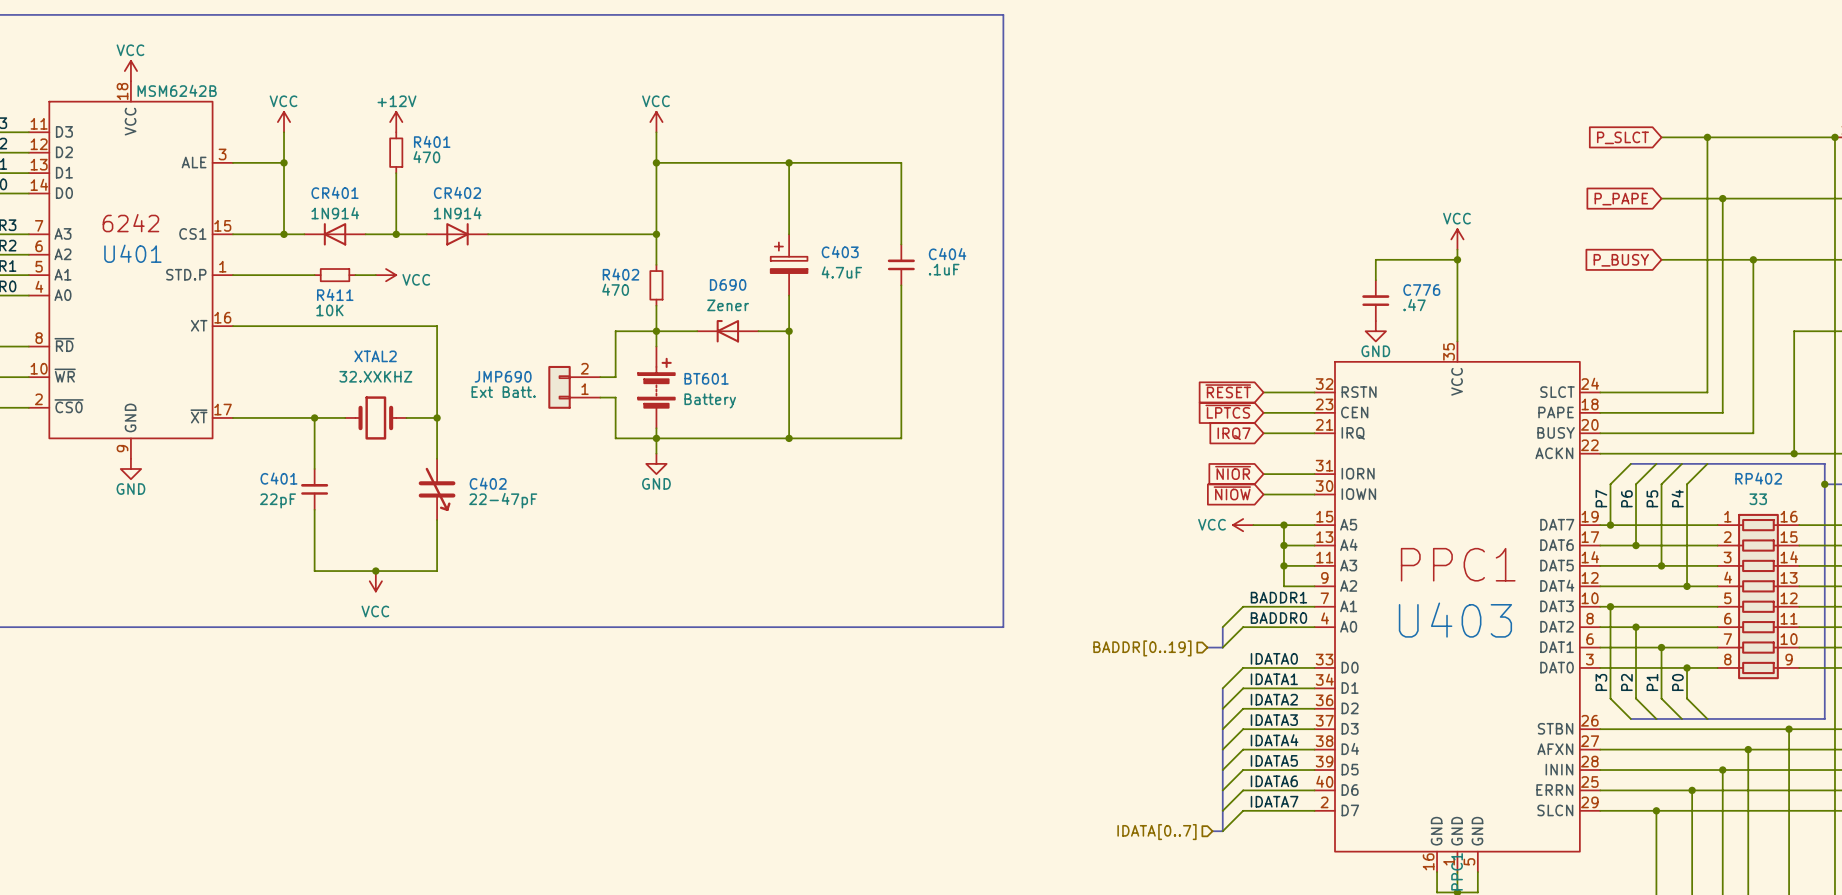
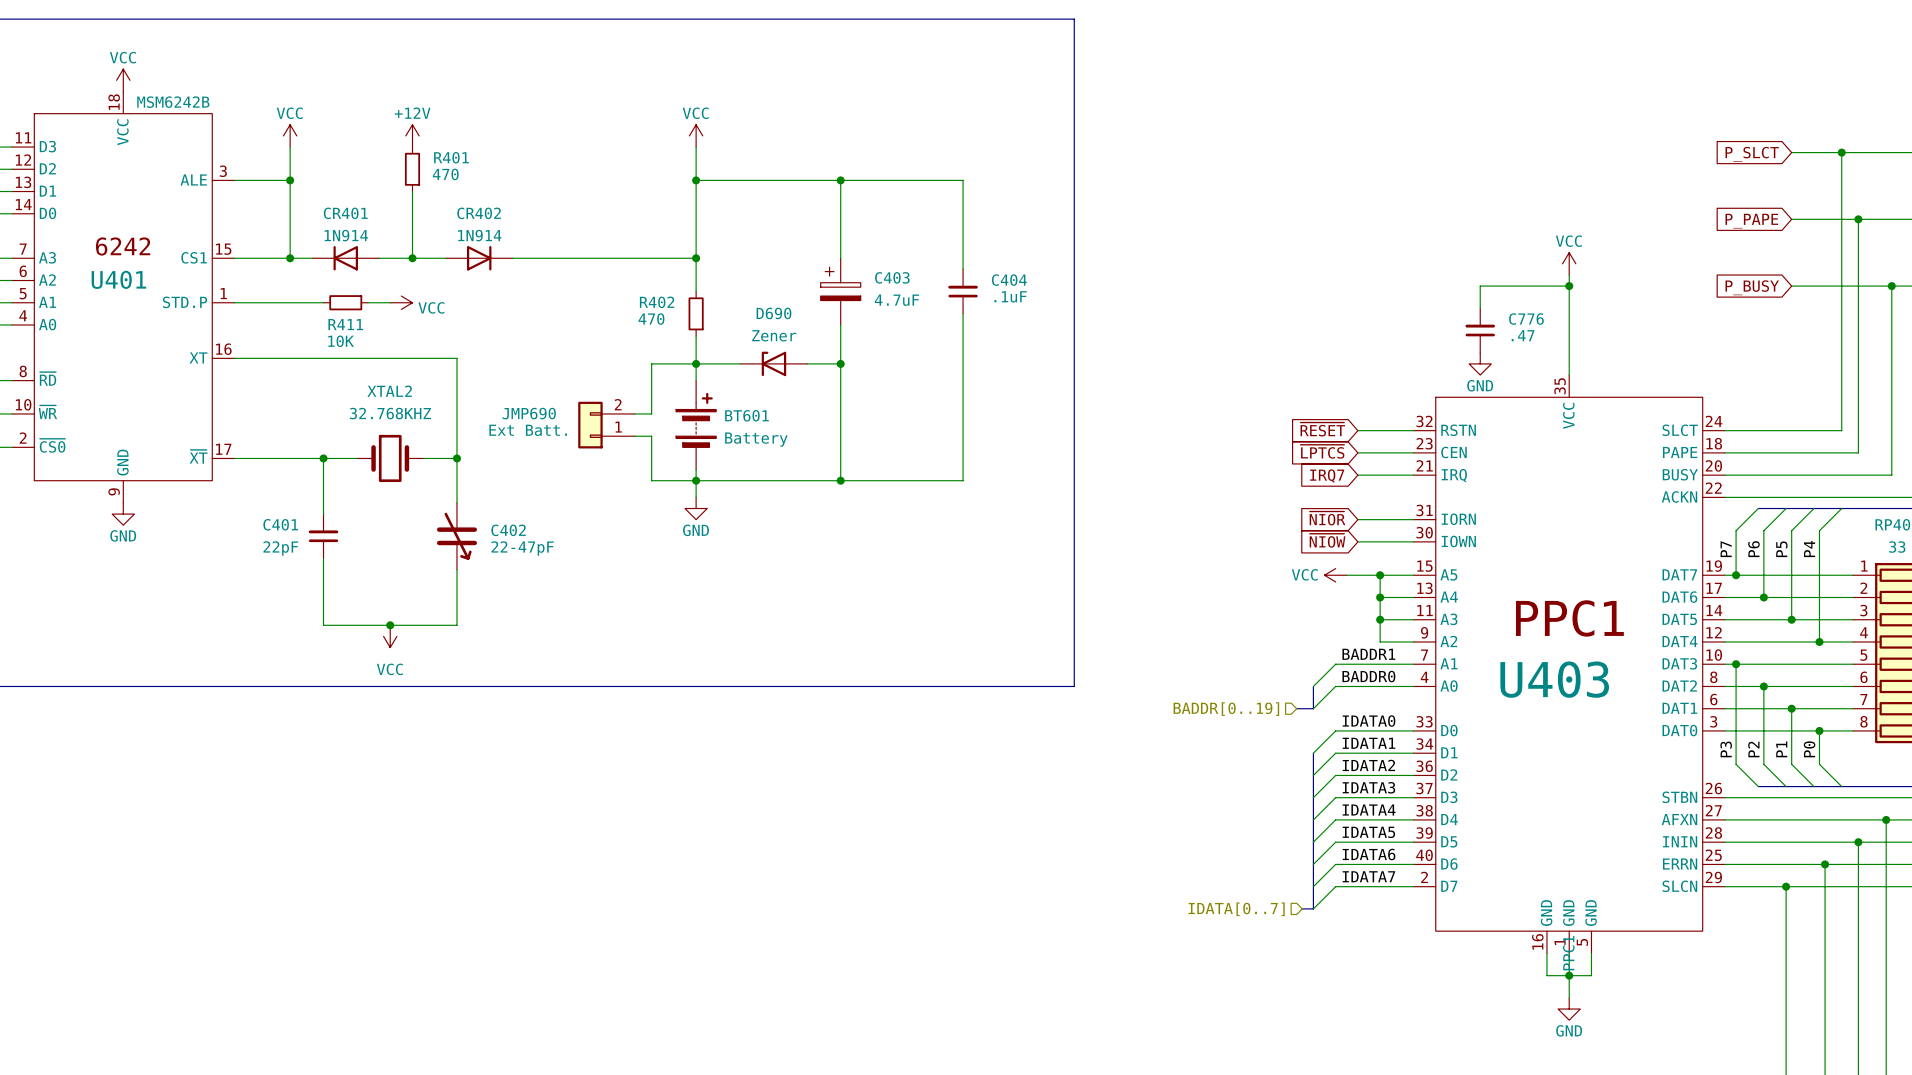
XTAL2 value: 32.XXKHZ (375, 376) -> 32.768KHZ (390, 413)

